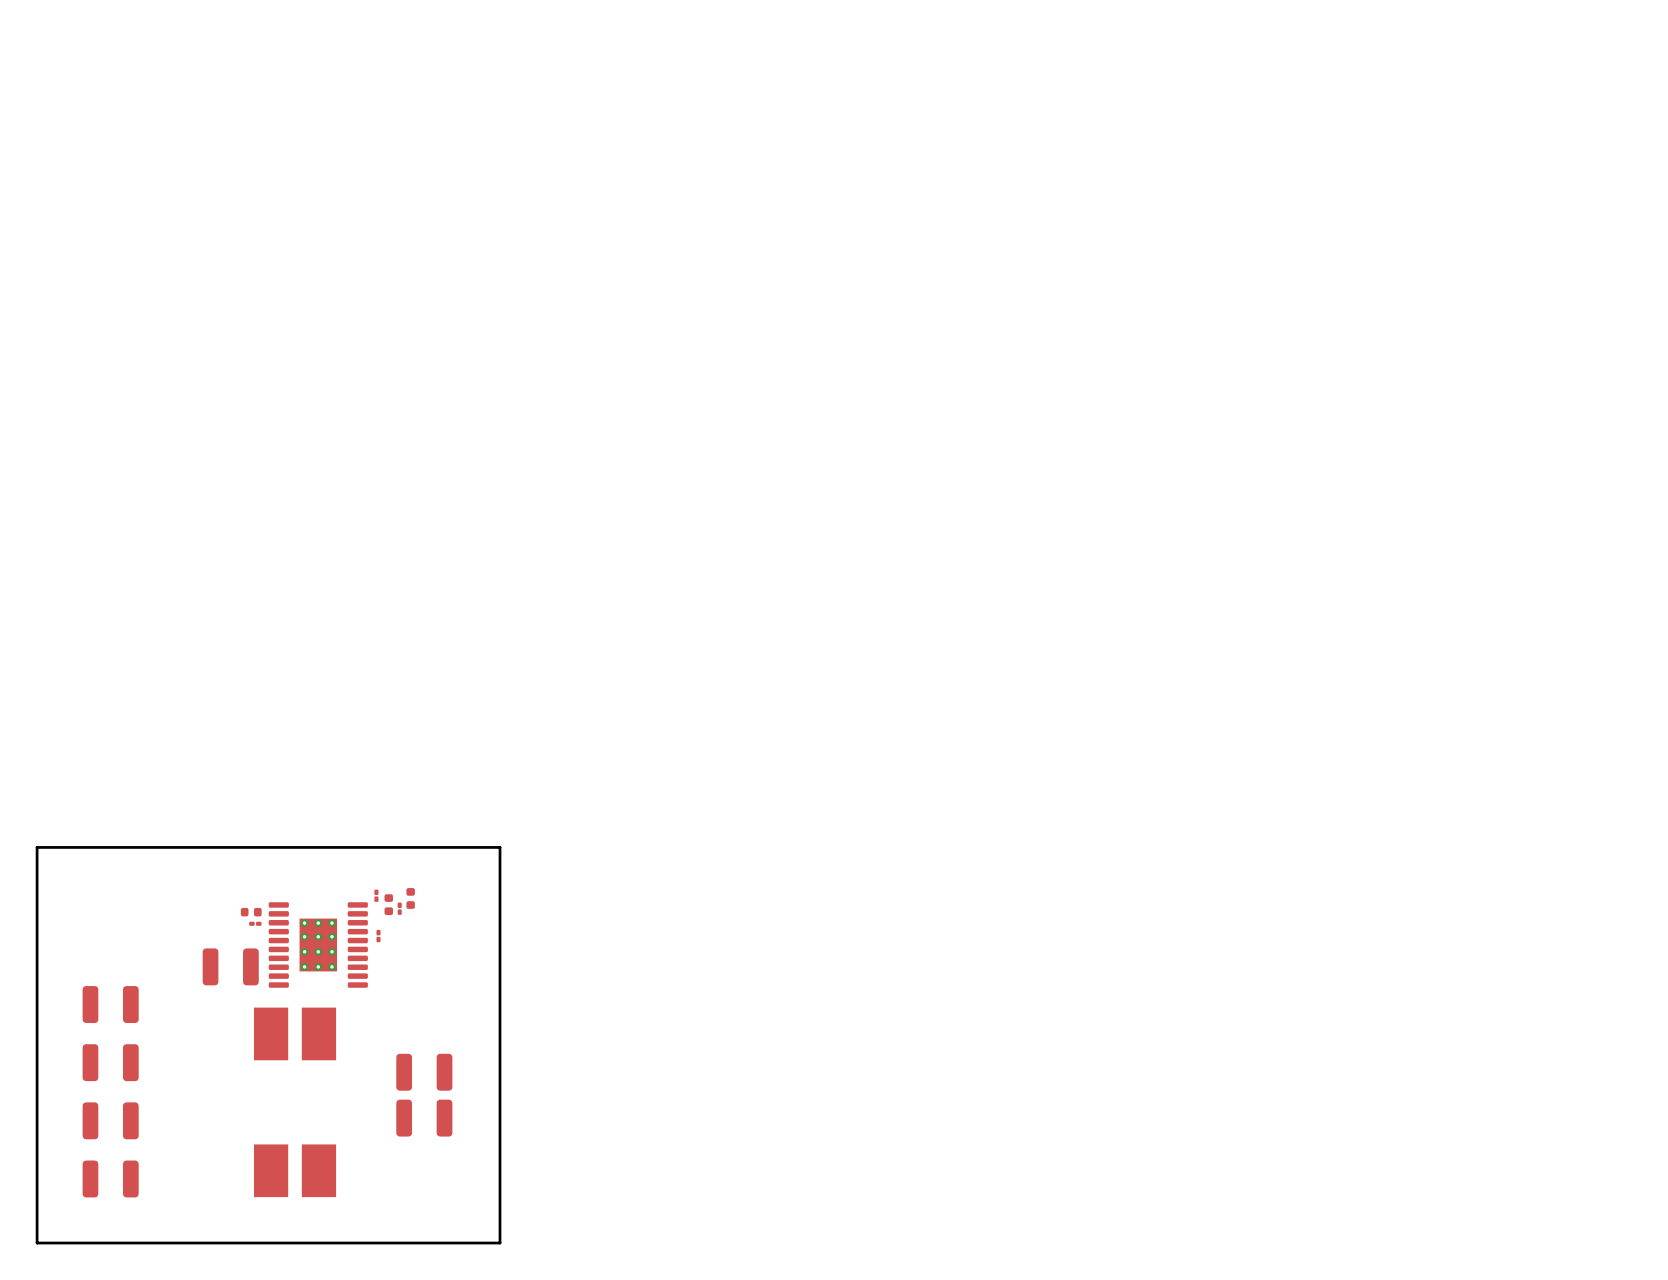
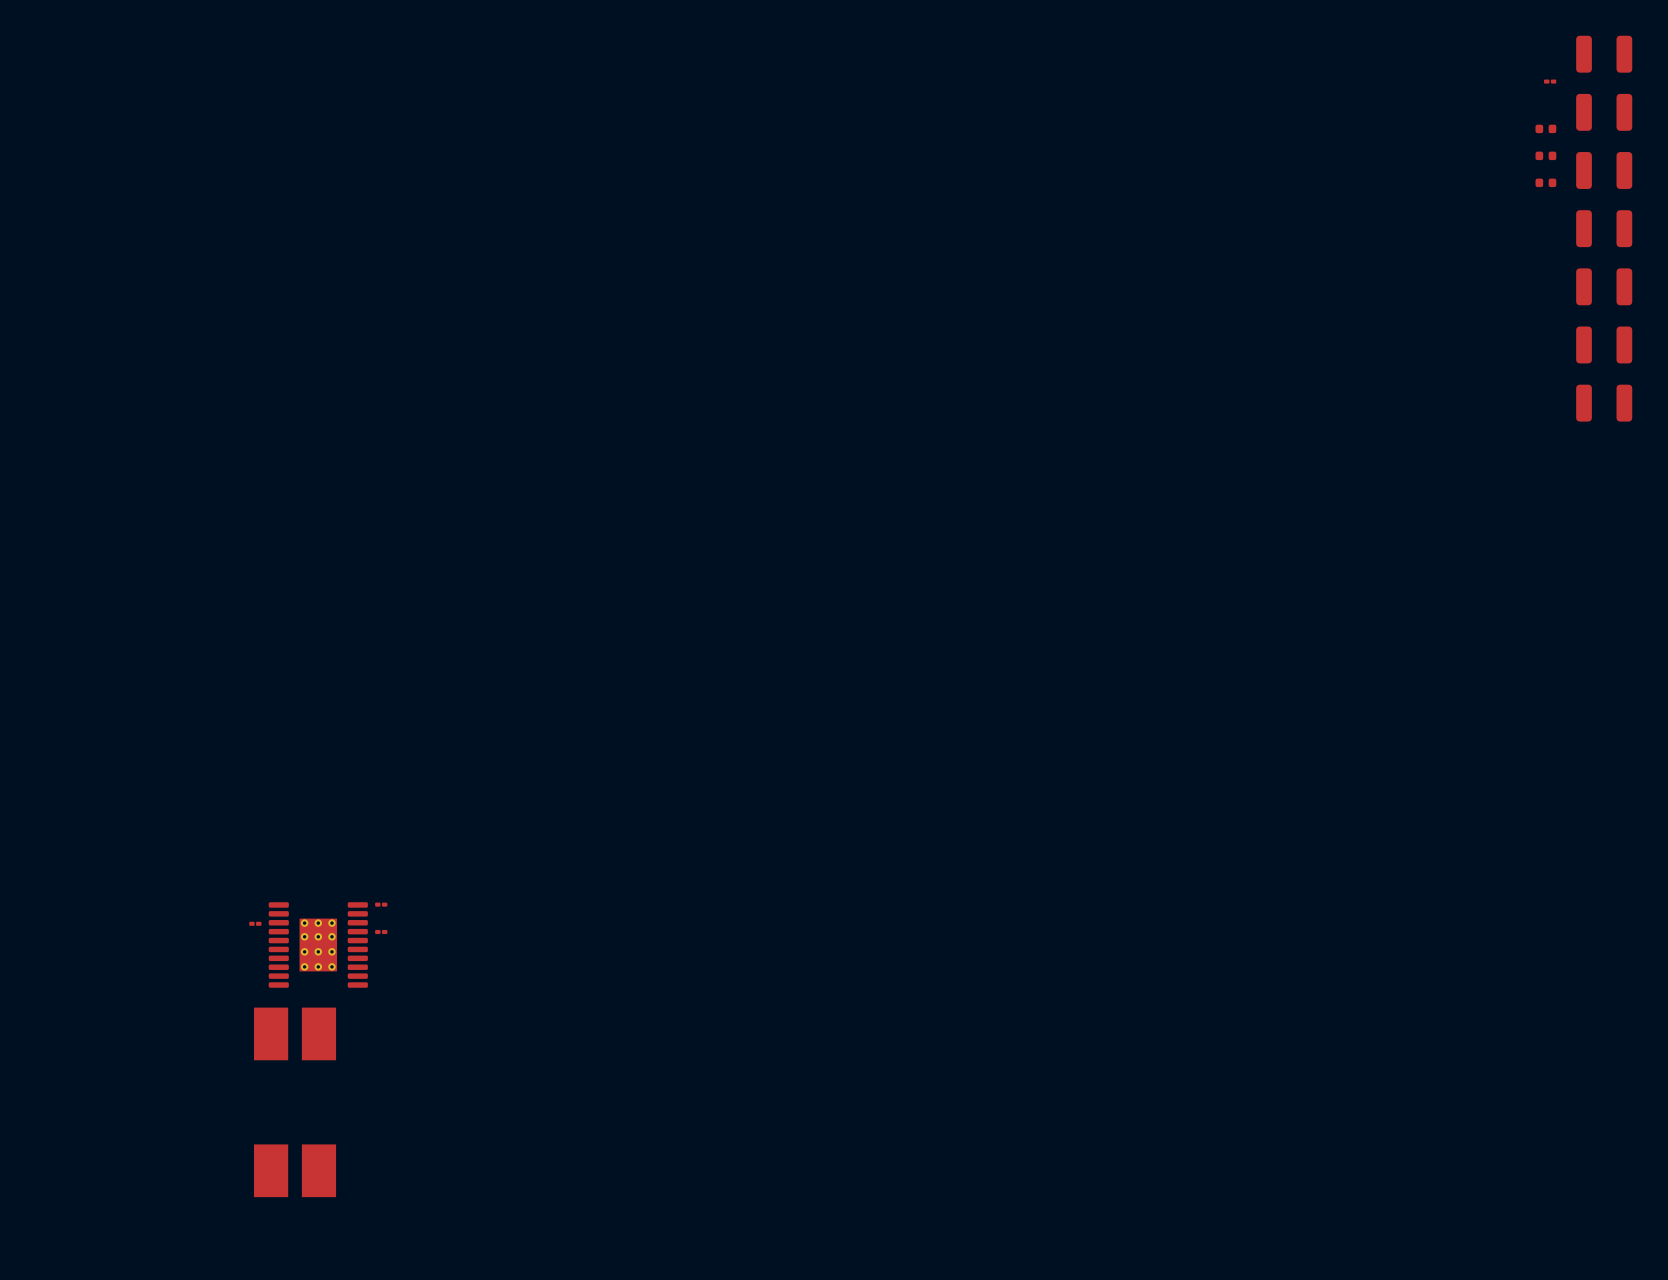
part: none -> (1604, 54)
part: none -> (1550, 81)
part: none -> (1604, 112)
part: none -> (1545, 128)
part: none -> (1545, 155)
part: none -> (1604, 170)
part: none -> (1545, 182)
part: none -> (1604, 228)
part: none -> (1604, 286)
part: none -> (1604, 344)
part: none -> (1604, 403)
board edge: (500, 847) (37, 847) (37, 1243) (500, 1243) (500, 847) -> none
part: (376, 895) -> none
part: (410, 898) -> none
part: none -> (381, 904)
part: (388, 904) -> none
part: (399, 908) -> none
part: (251, 912) -> none
part rotation: 0° (378, 936) -> 90° clockwise (381, 932)
part: (230, 966) -> none
part: (110, 1004) -> none
part: (110, 1062) -> none
part: (424, 1072) -> none
part: (424, 1118) -> none
part: (110, 1120) -> none
part: (110, 1178) -> none

